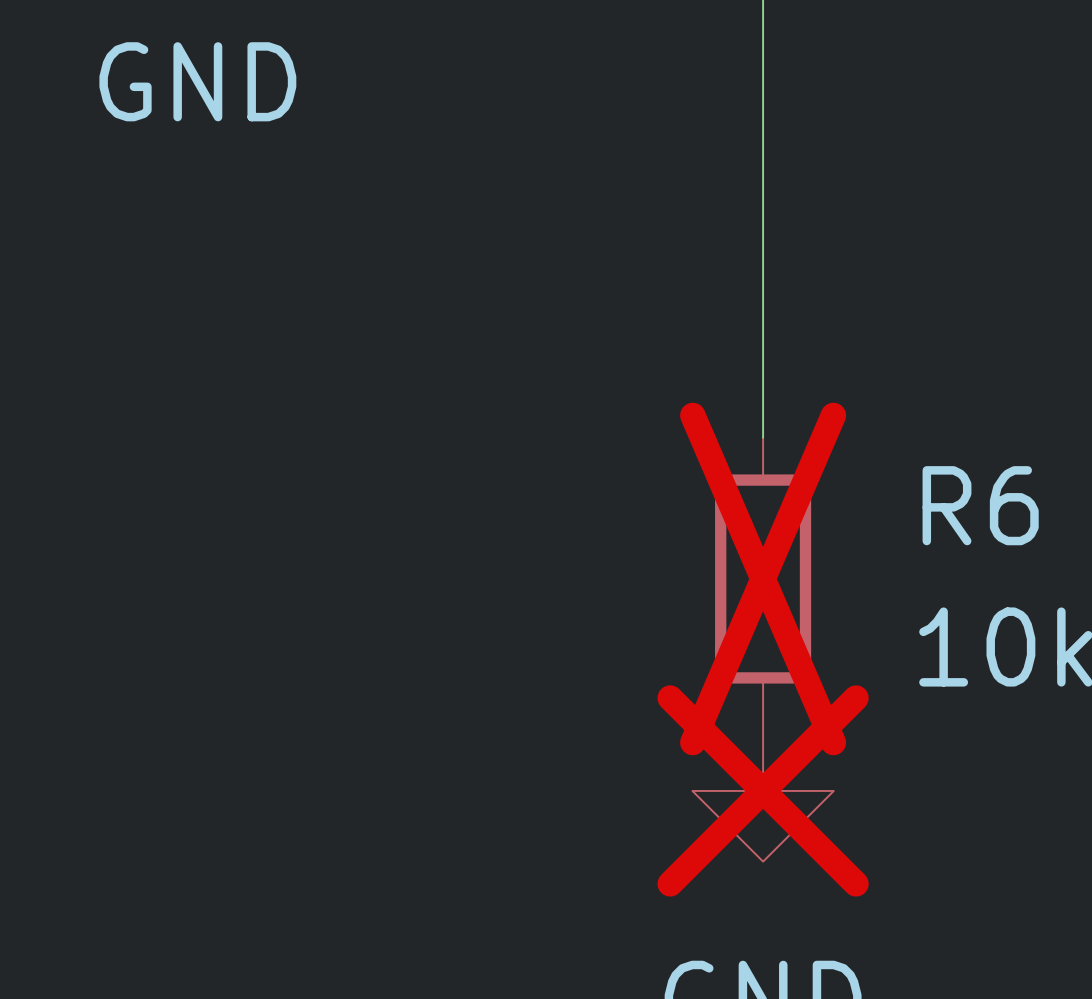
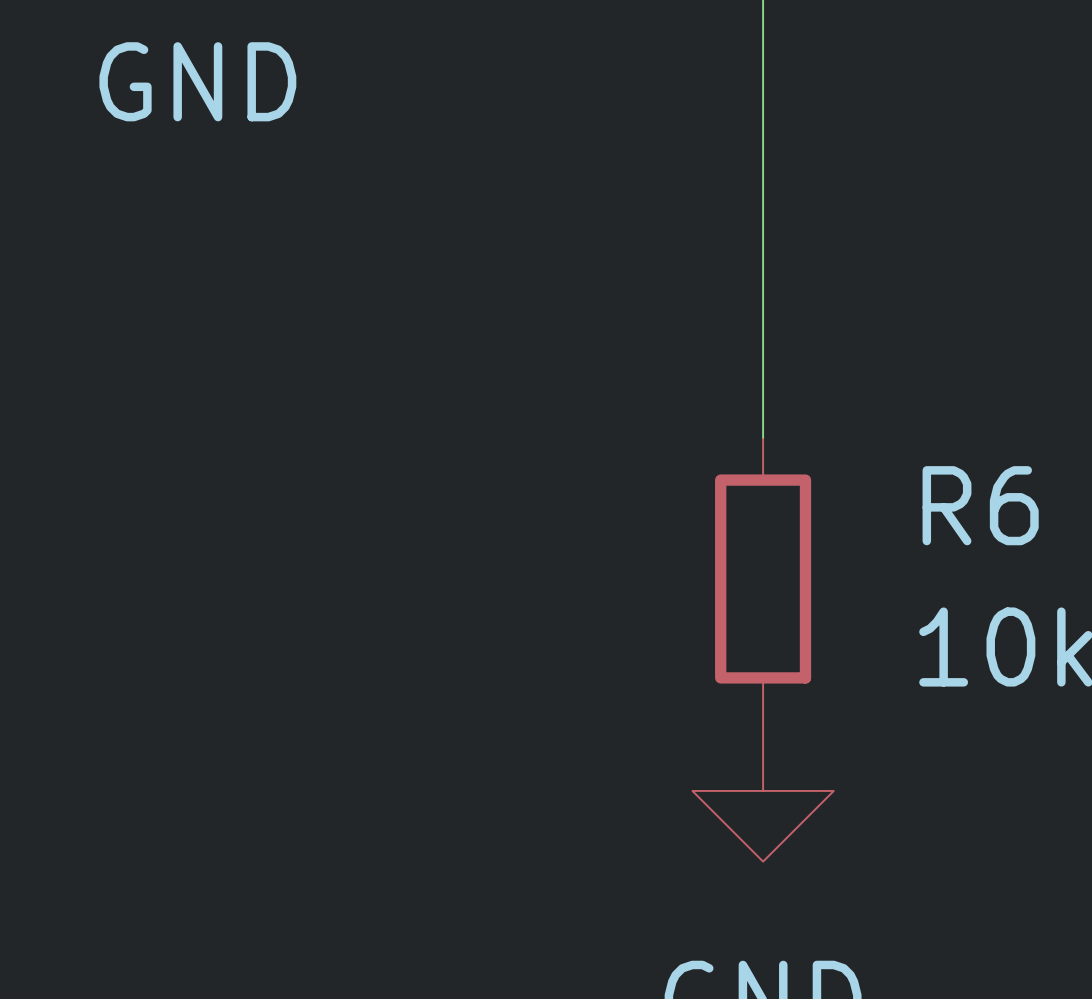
R6 do-not-place cross: (763, 579) -> none
power symbol do-not-place cross: (763, 790) -> none

